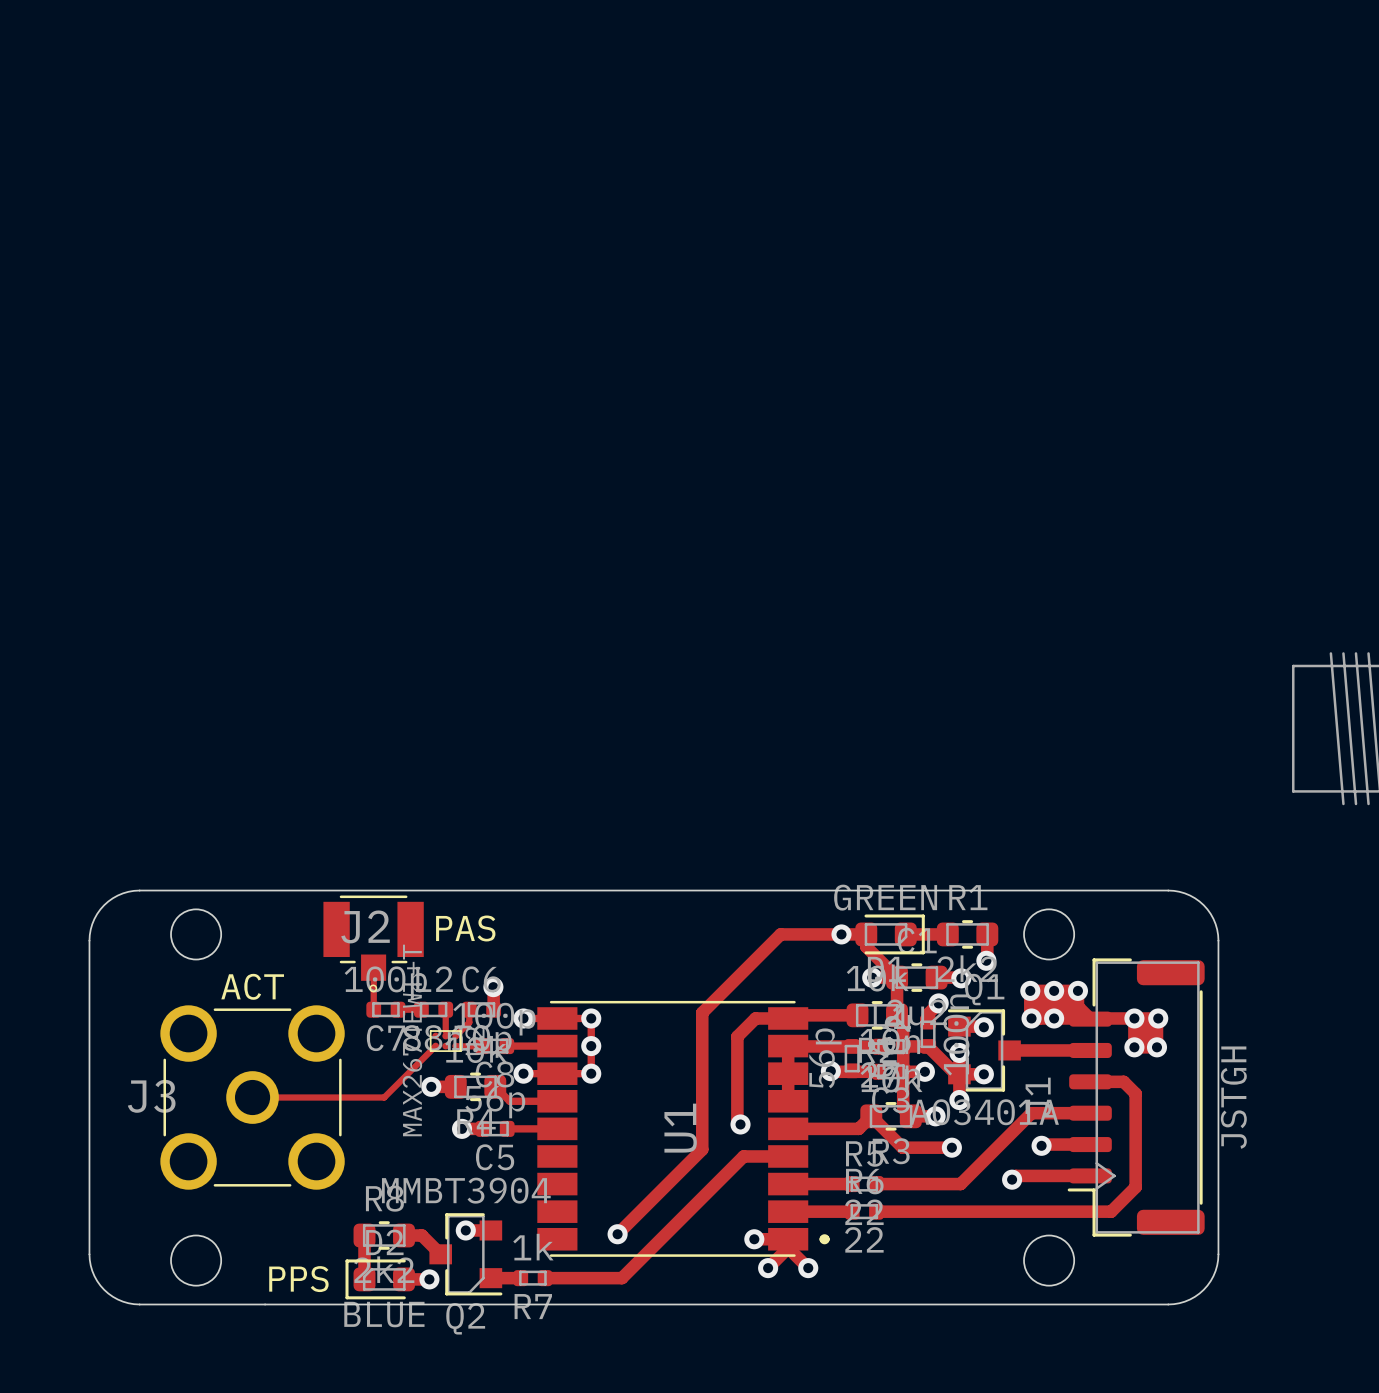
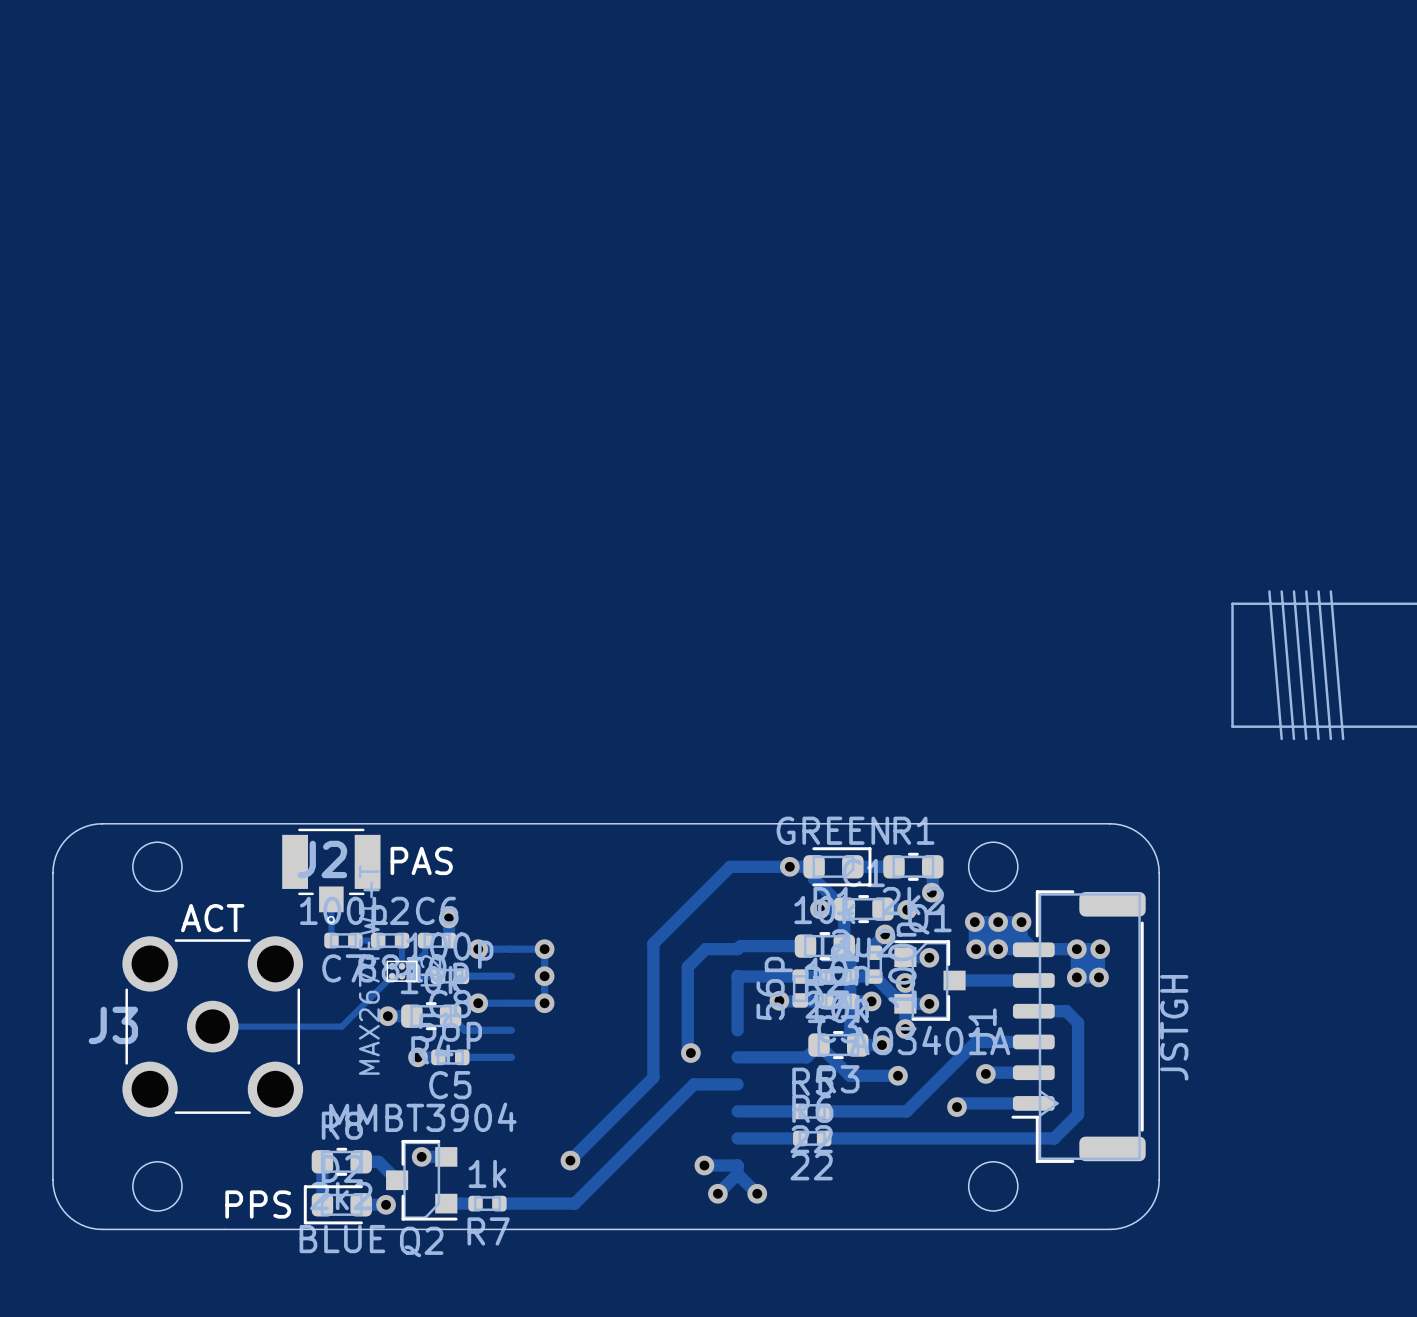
U1: (683, 1128) -> none

